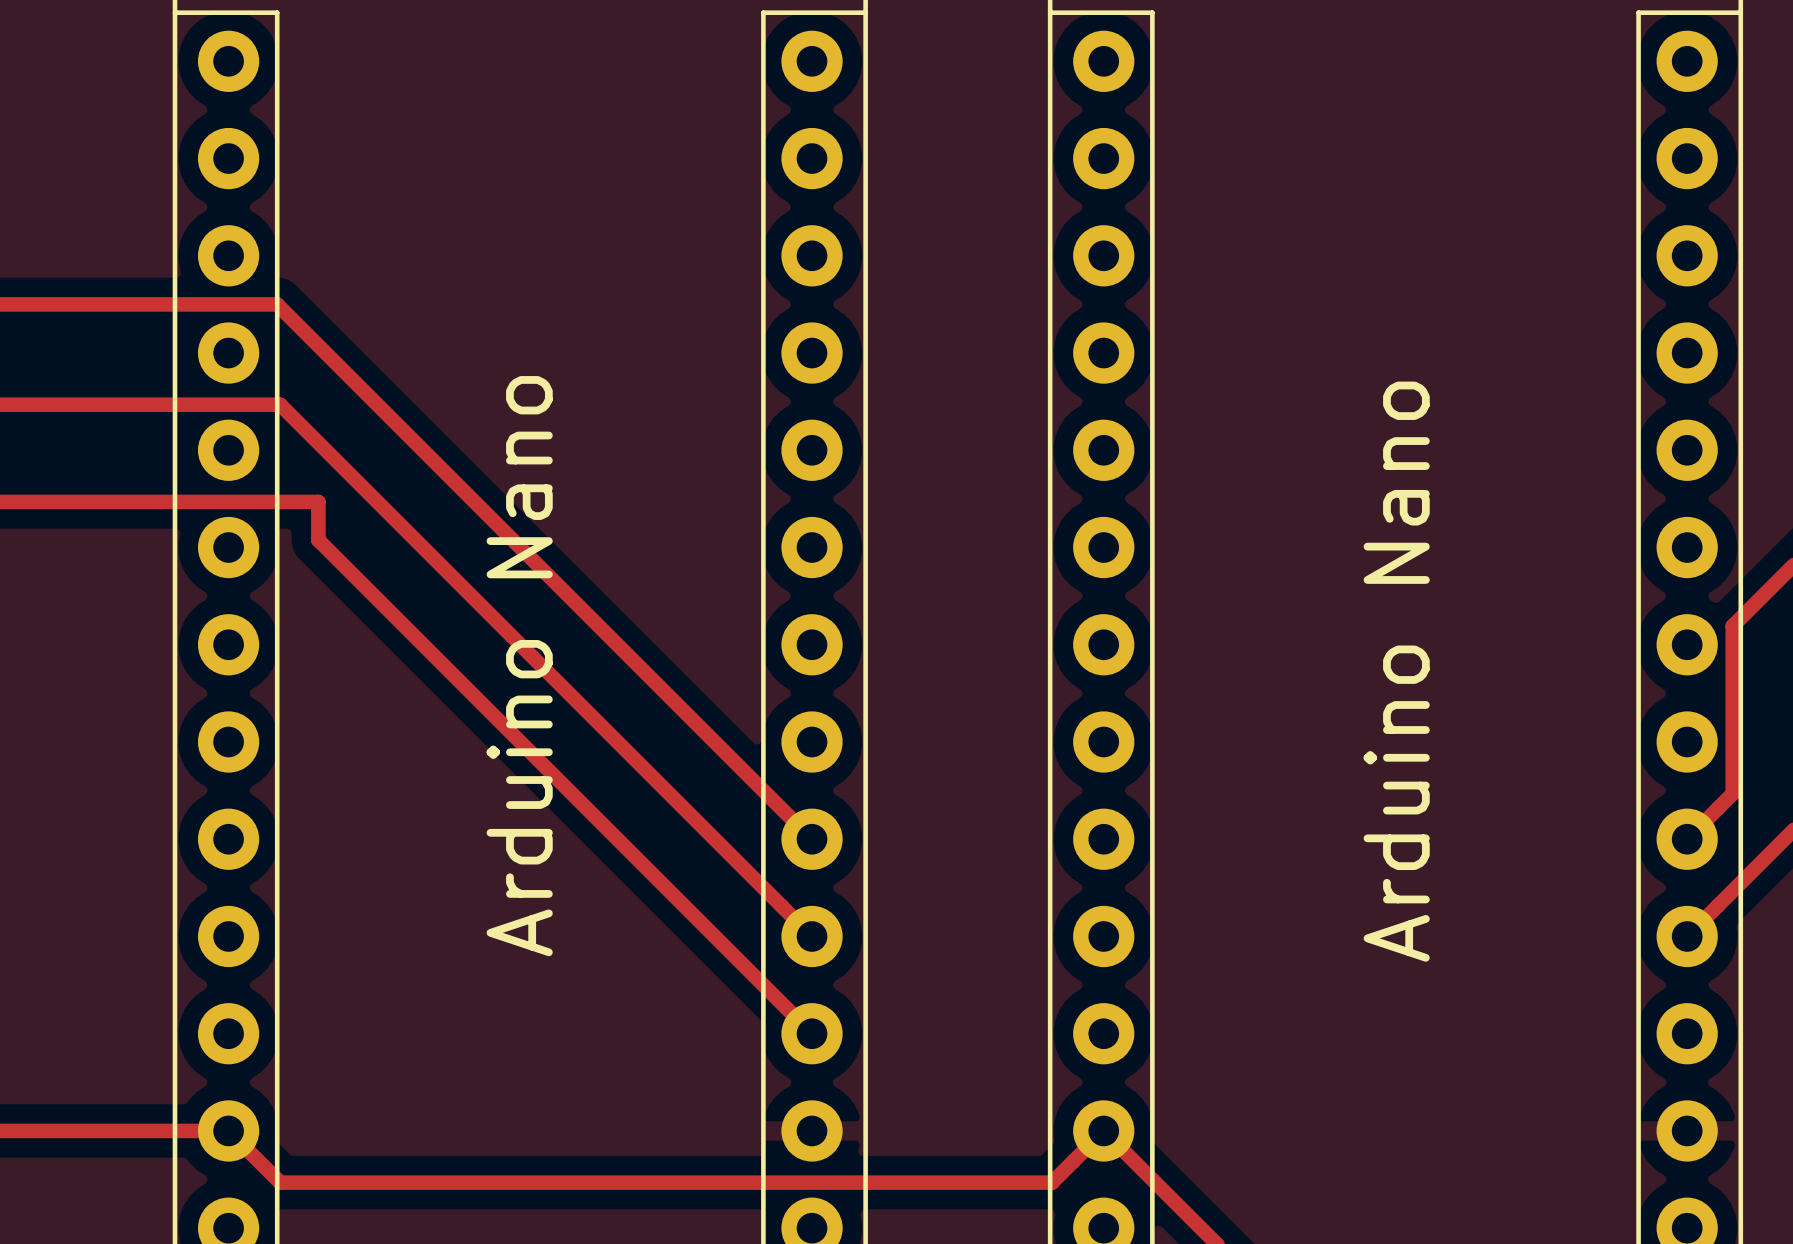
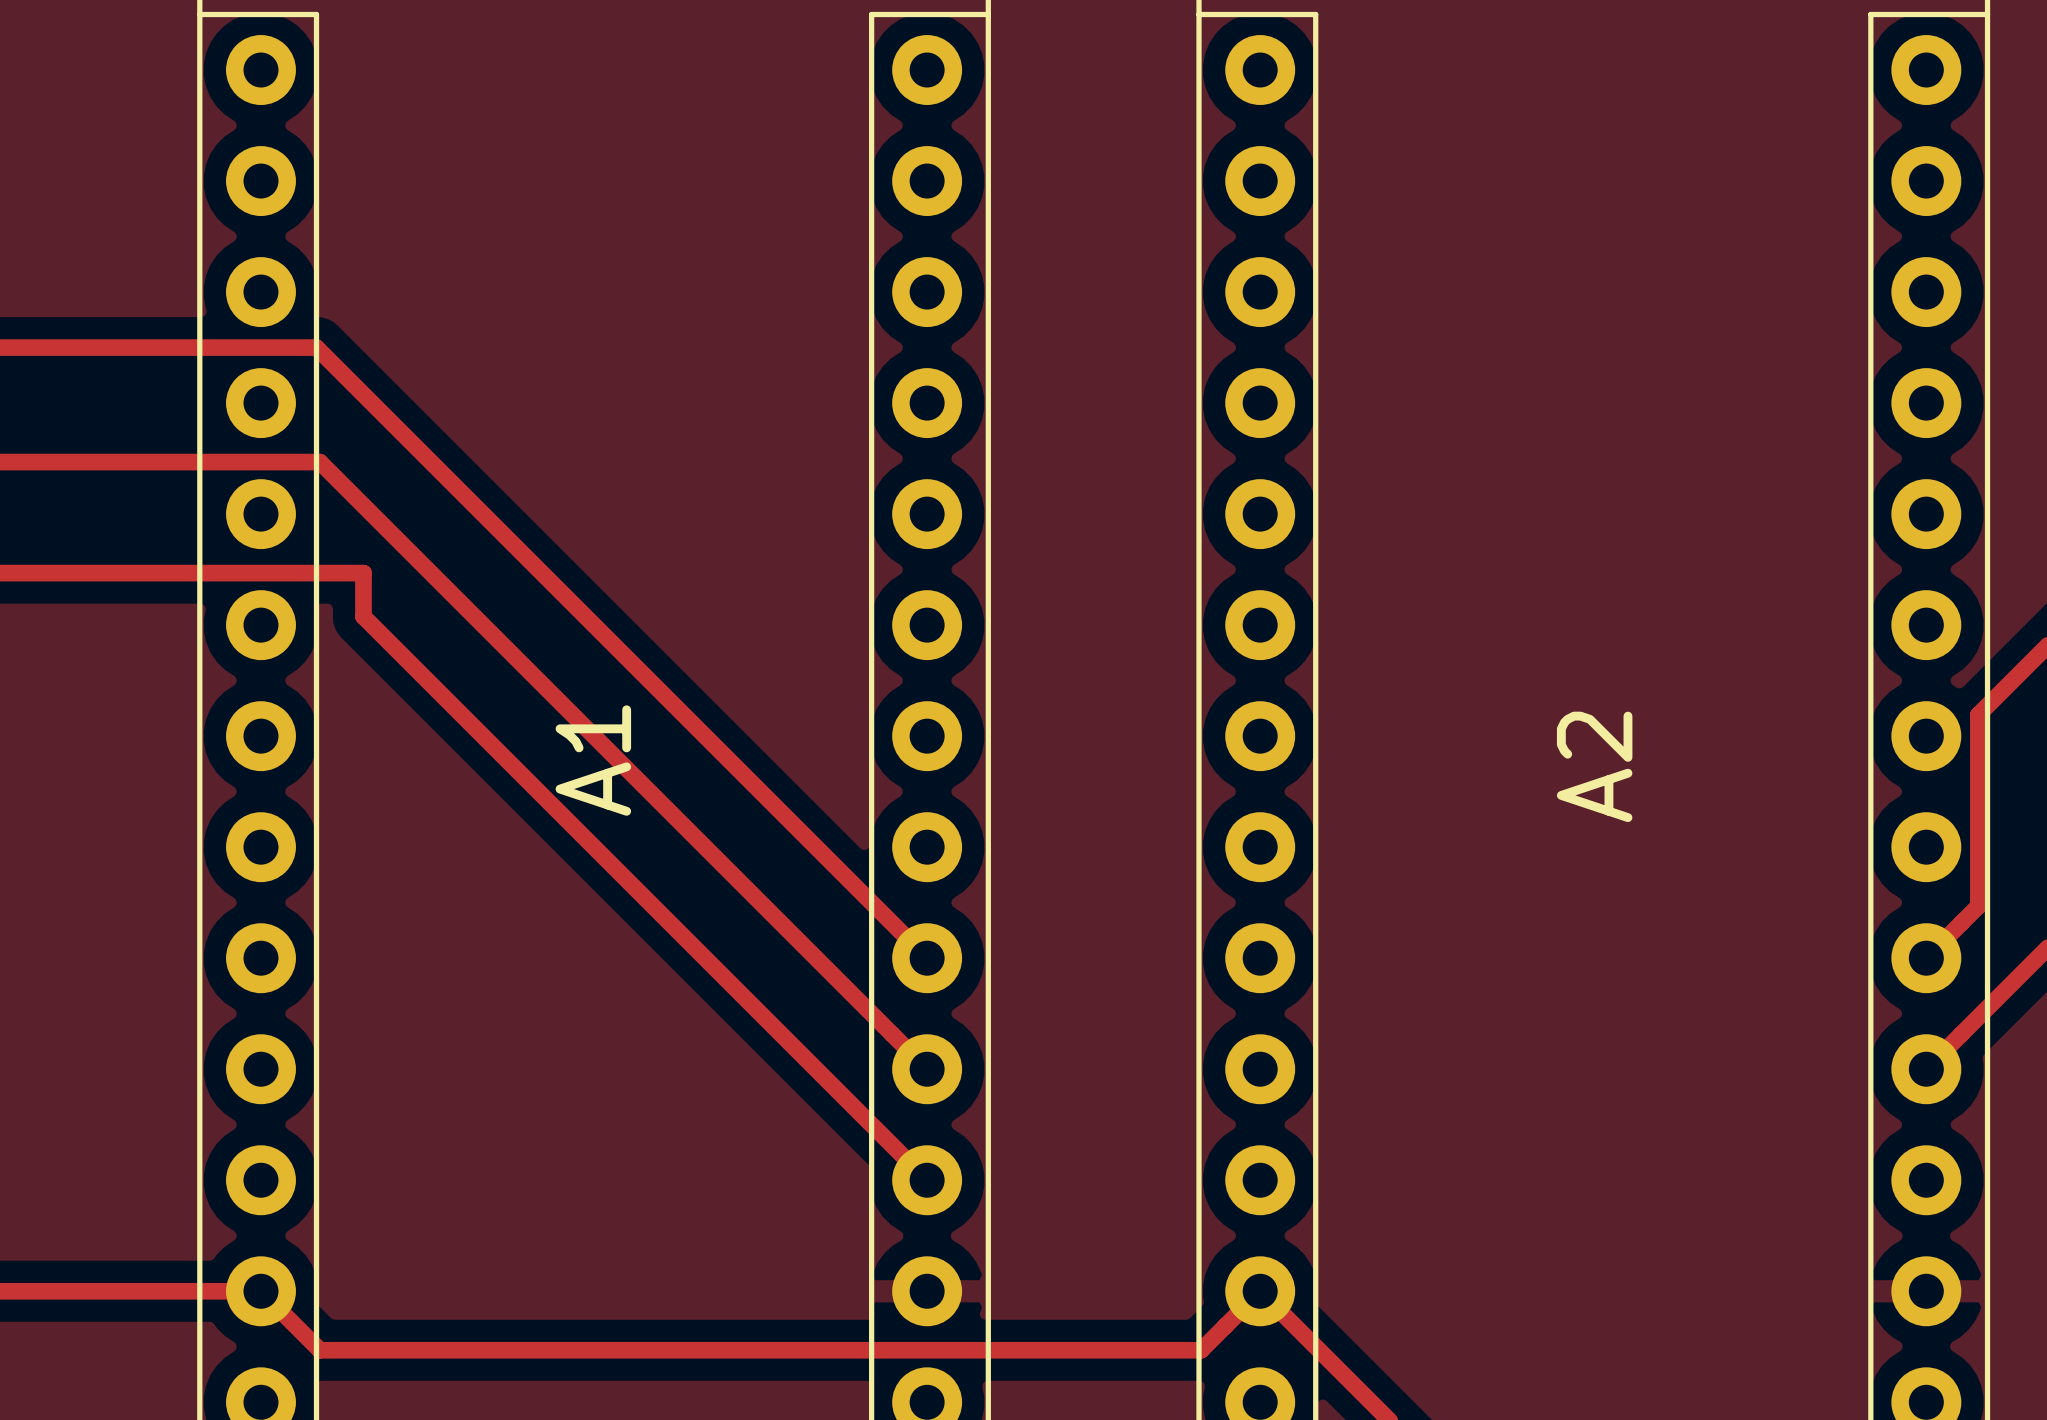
Arduino Nano name: Arduino Nano (519, 666) -> A1 (593, 760)
Arduino Nano name: Arduino Nano (1396, 671) -> A2 (1594, 766)

